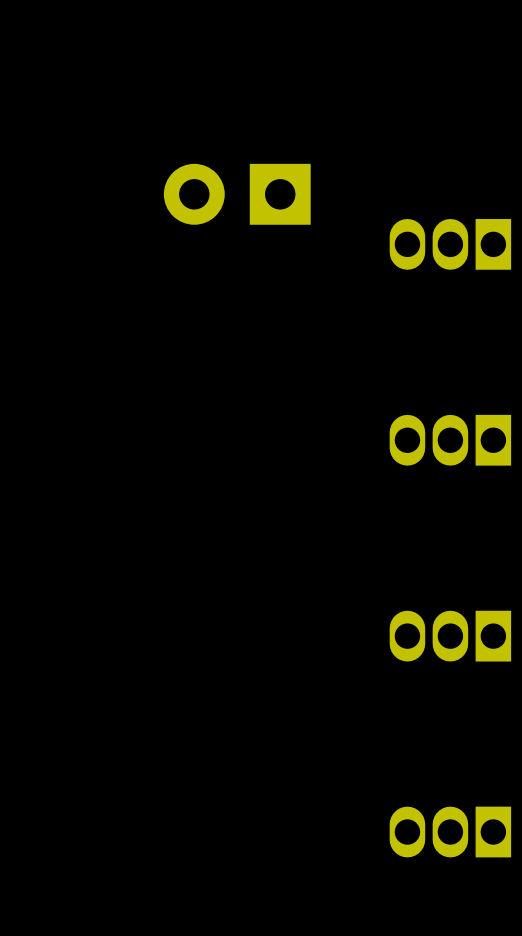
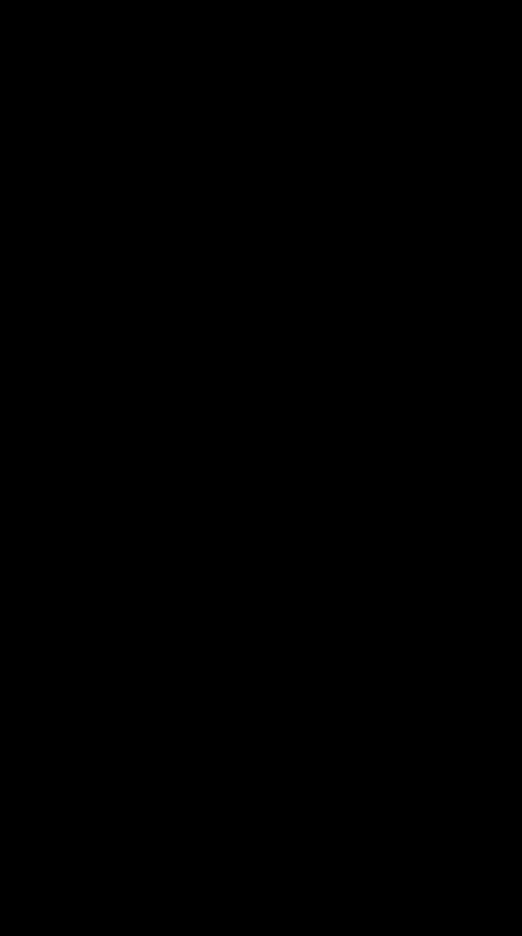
part: (237, 194) -> none
part: (450, 244) -> none
part: (450, 440) -> none
part: (450, 636) -> none
part: (450, 832) -> none

